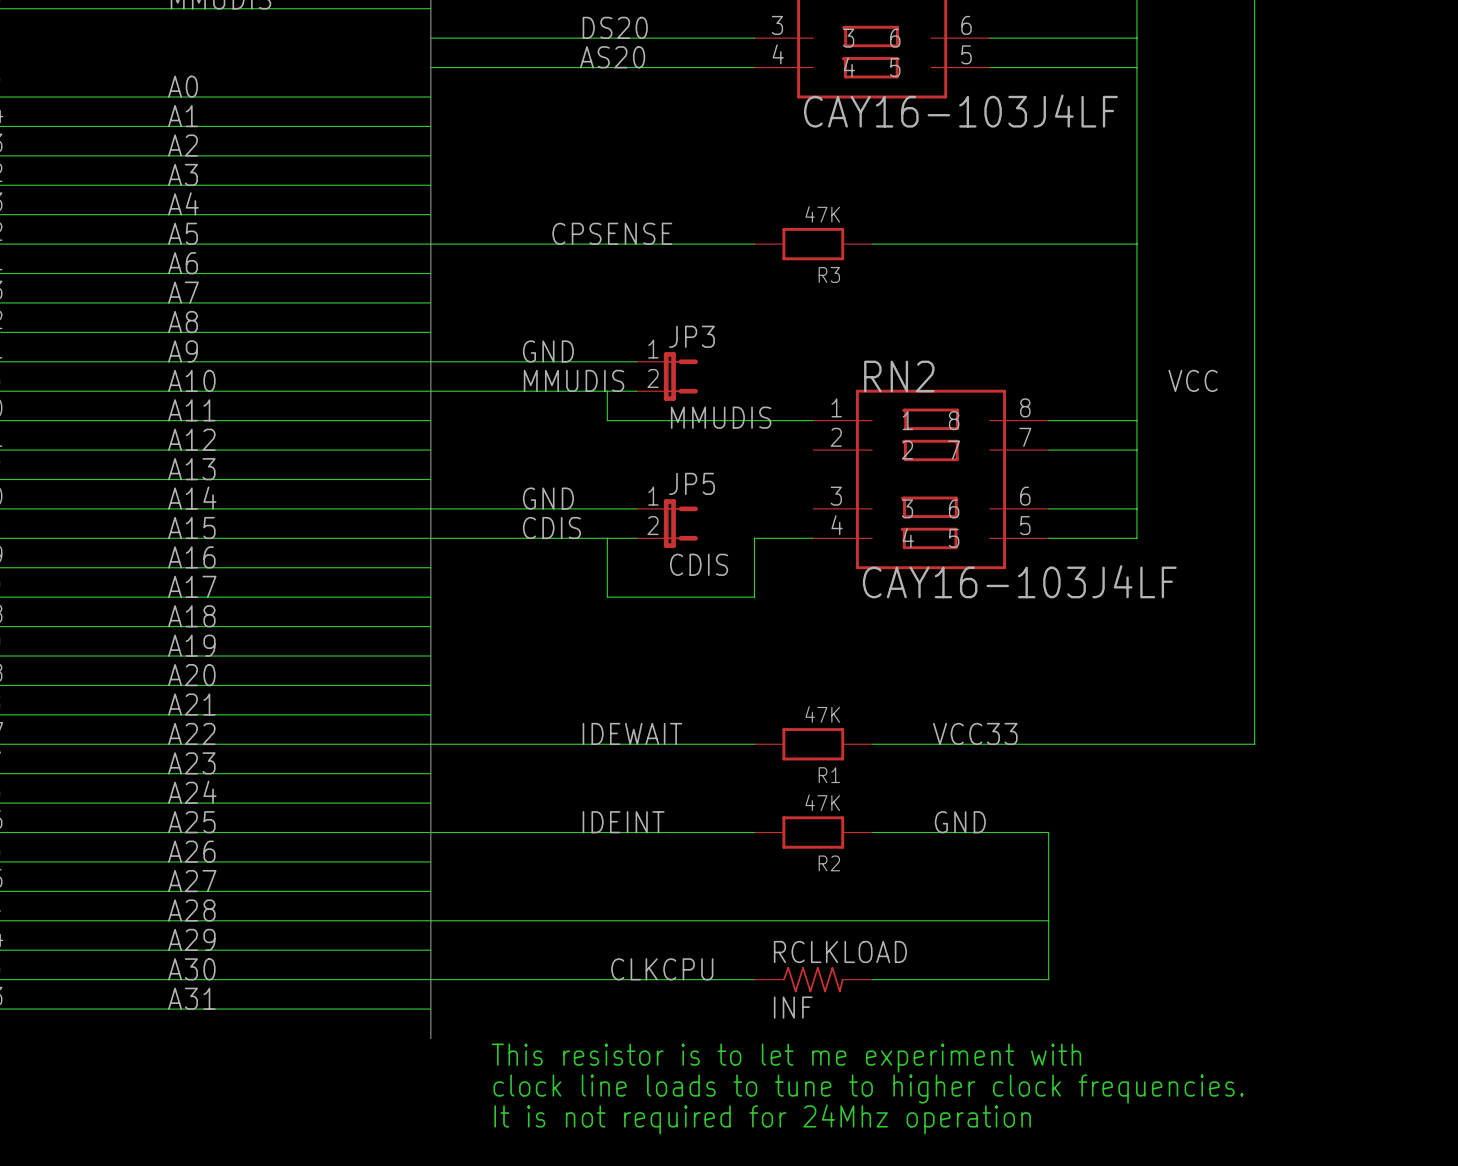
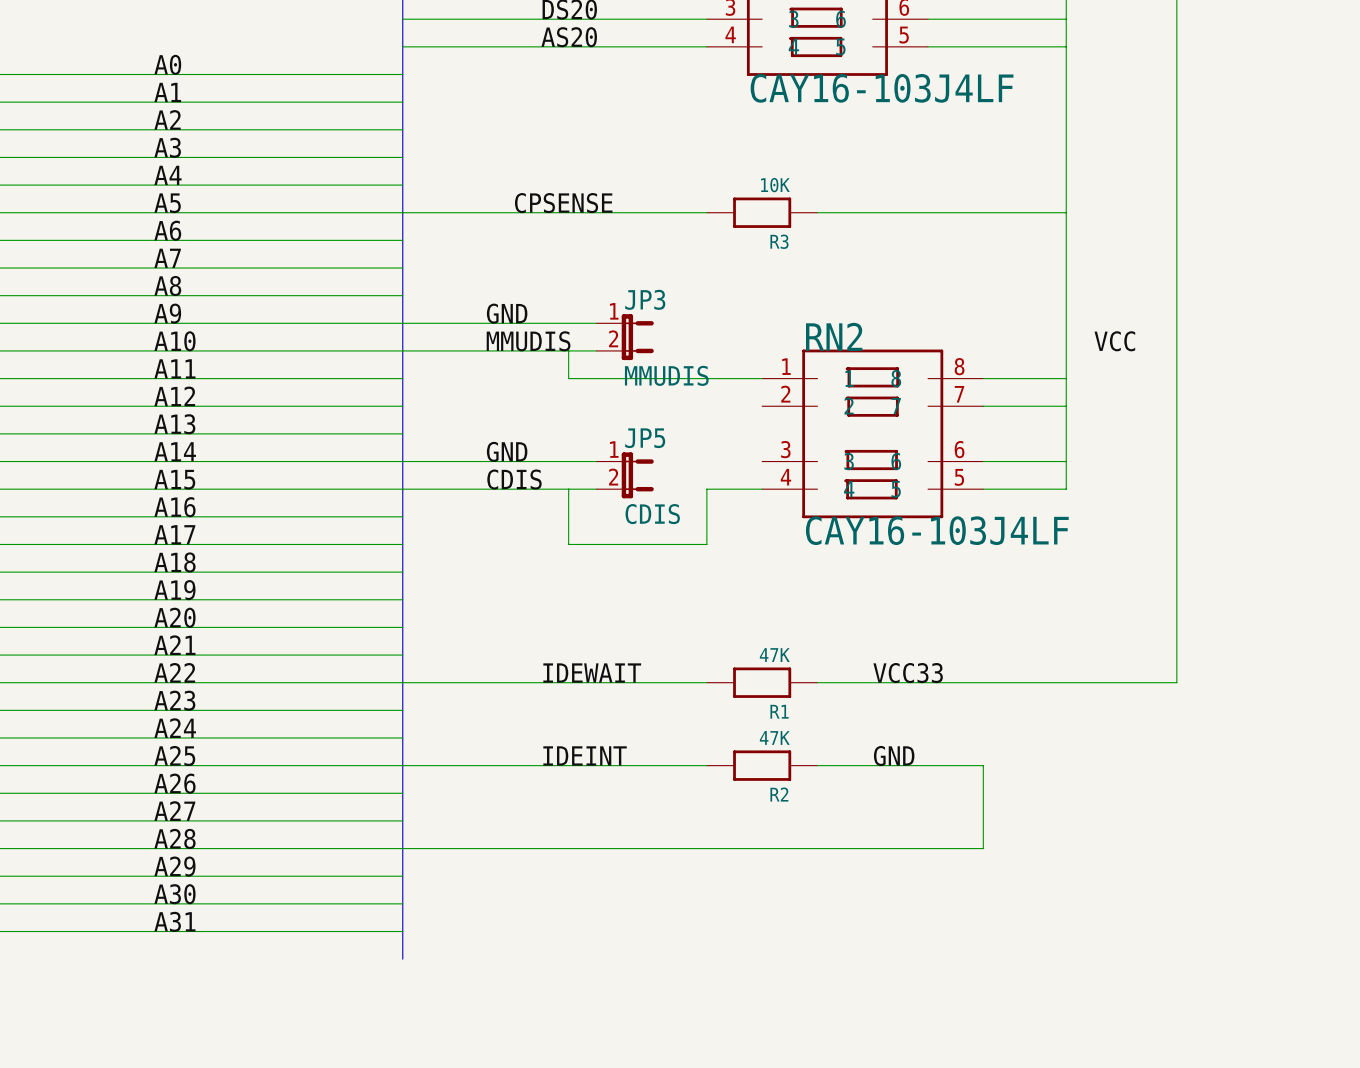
R3 value: 47K (822, 214) -> 10K (775, 185)
wire: (1048, 920) (1048, 979) (872, 979) -> none
label: CLKCPU (662, 969) -> none
wire: (430, 979) (754, 979) -> none
RCLKLOAD: INF (813, 979) -> none
text: This resistor is to let me experiment with (786, 1058) -> none
text: clock line loads to tune to higher clock frequencies. (868, 1088) -> none
text: It is not required for 24Mhz operation (762, 1119) -> none

